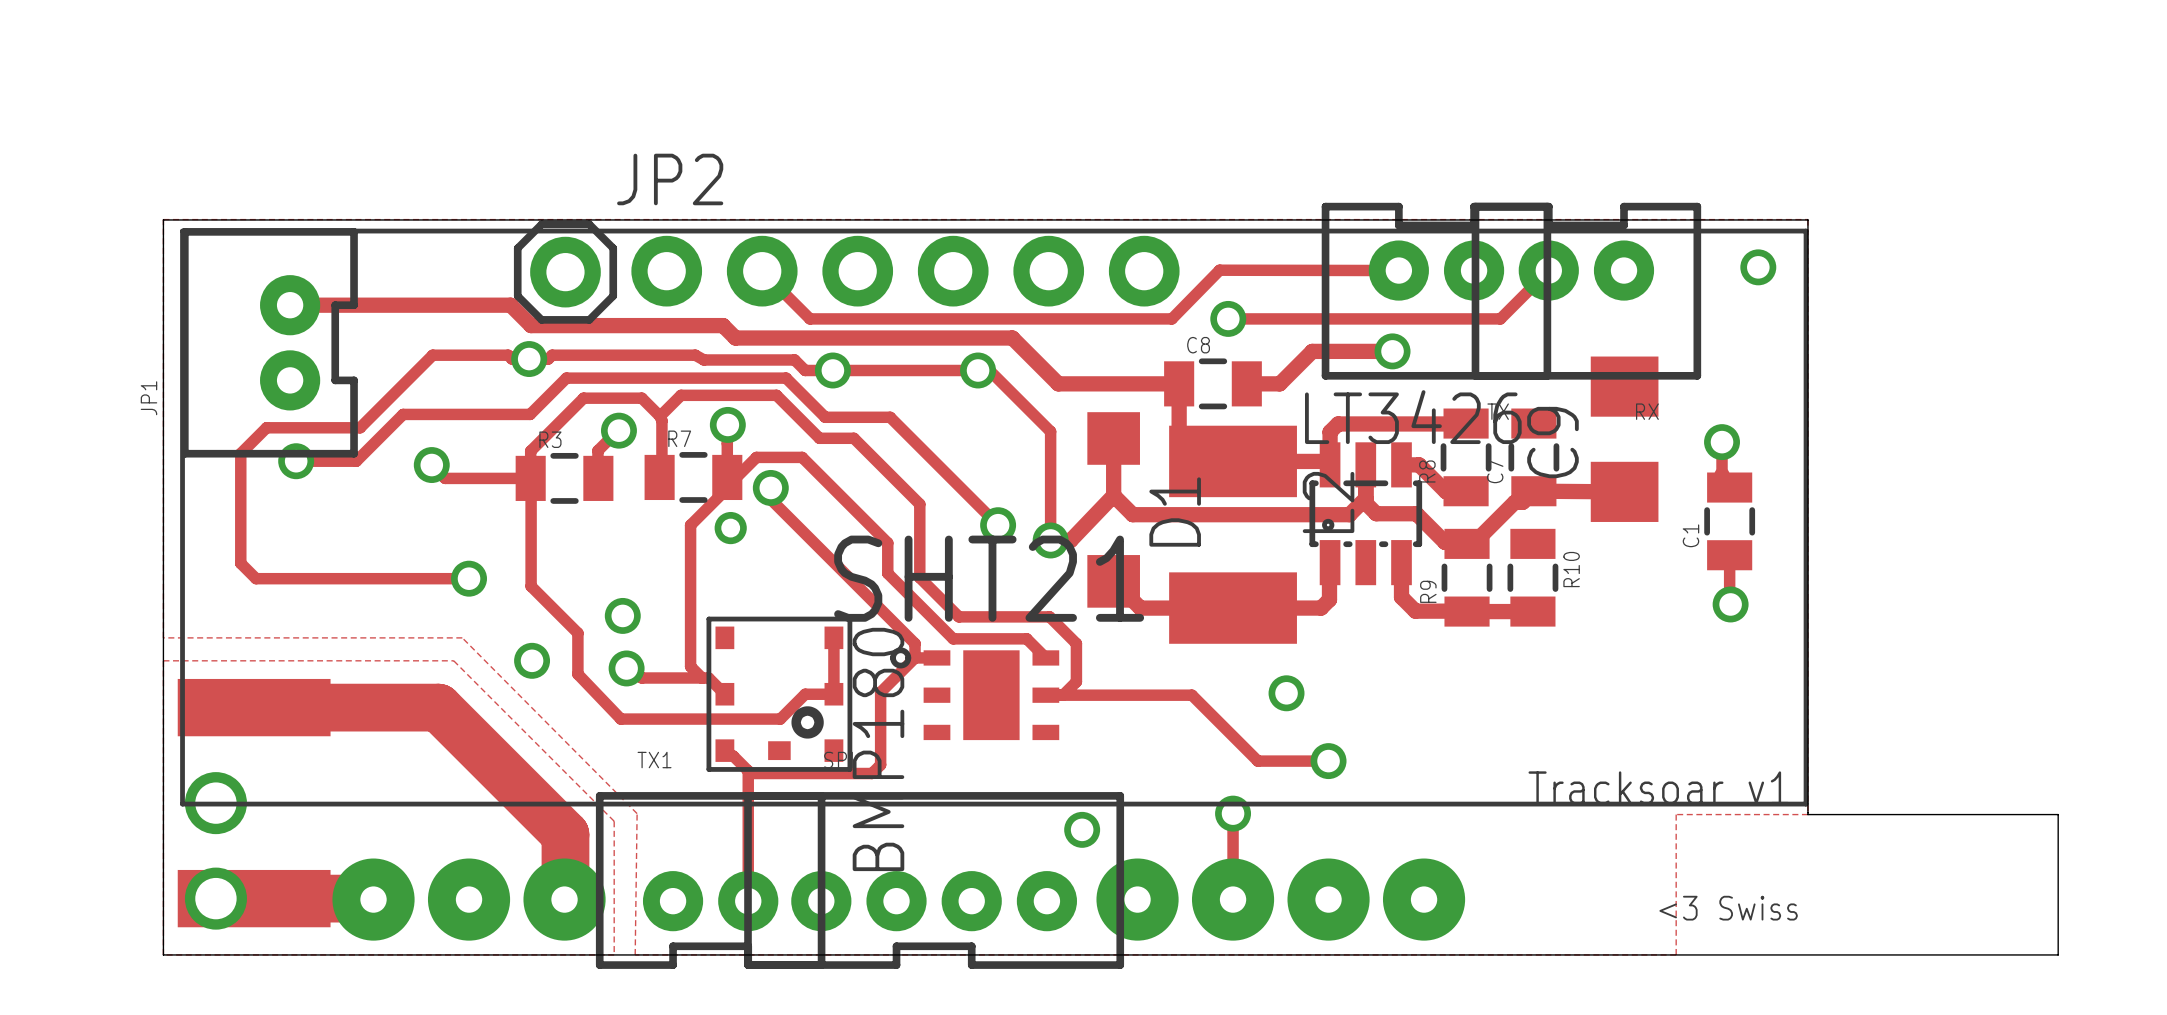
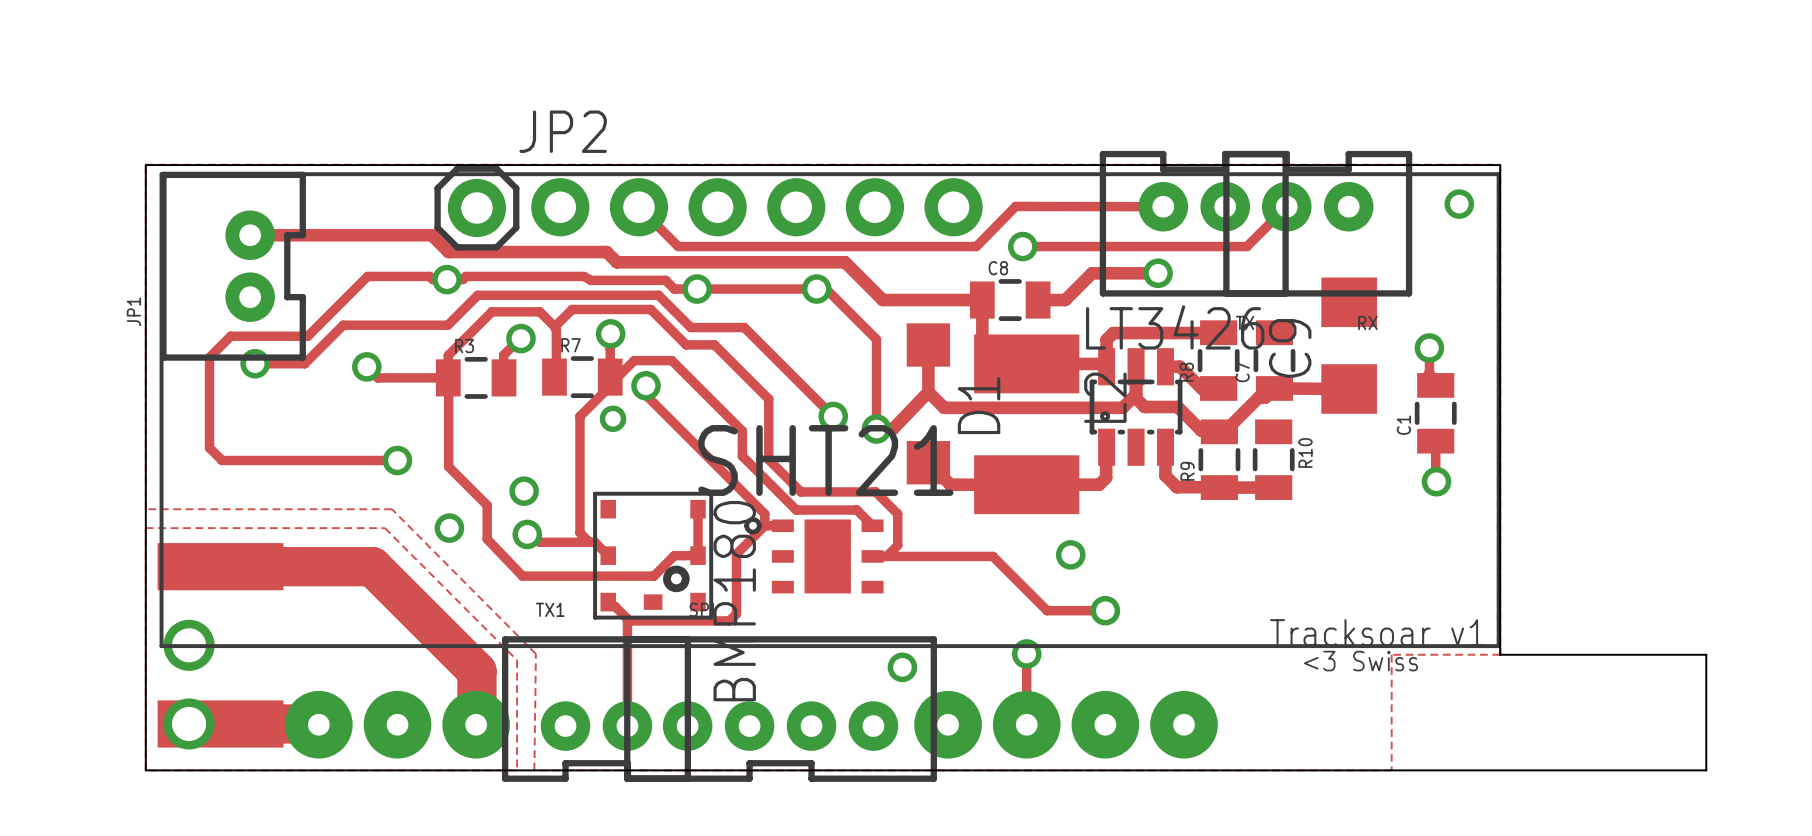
text position: <3 Swiss (1728, 908) -> <3 Swiss (1360, 661)

